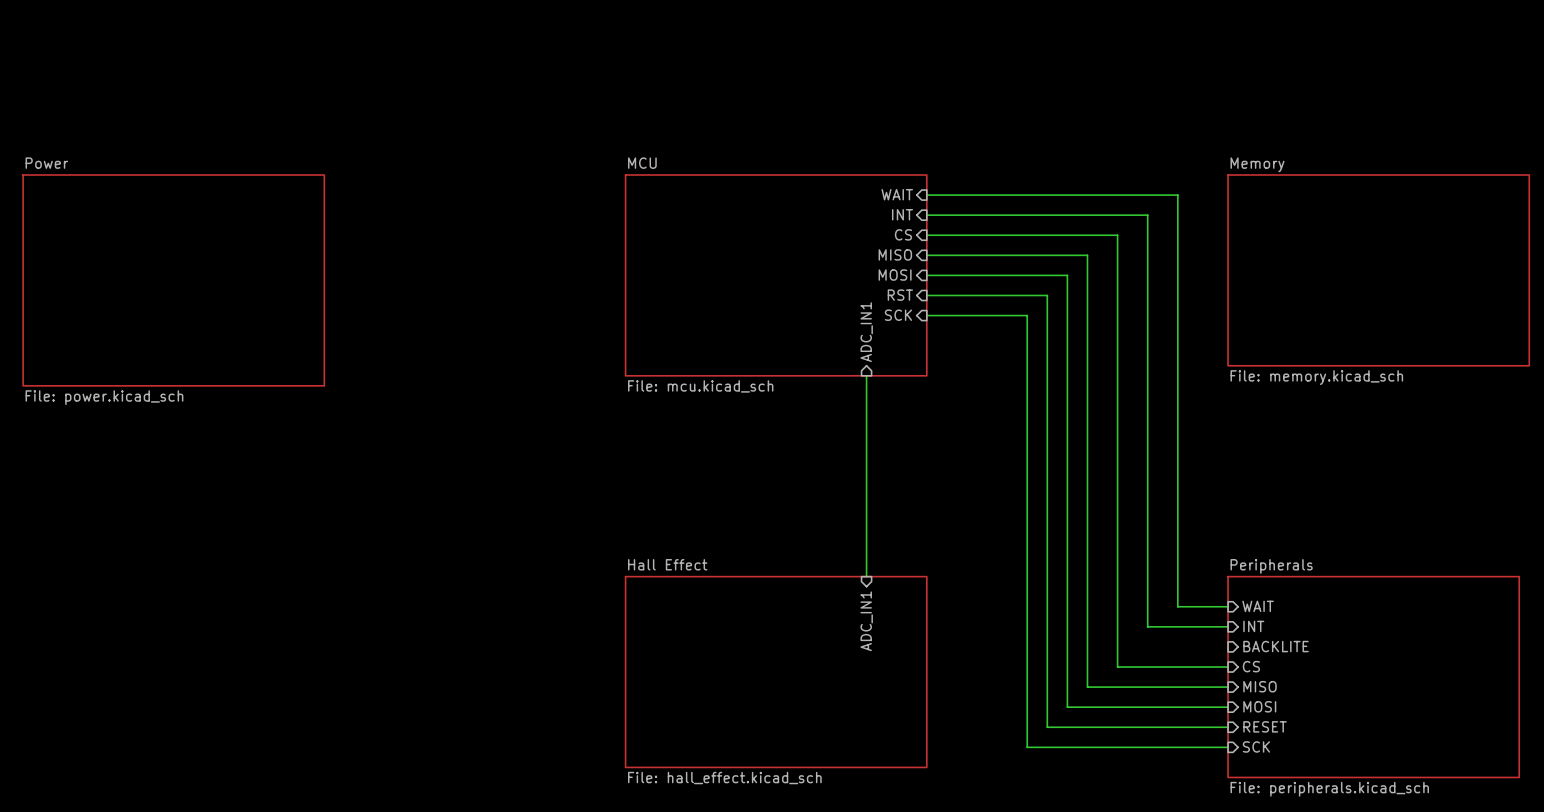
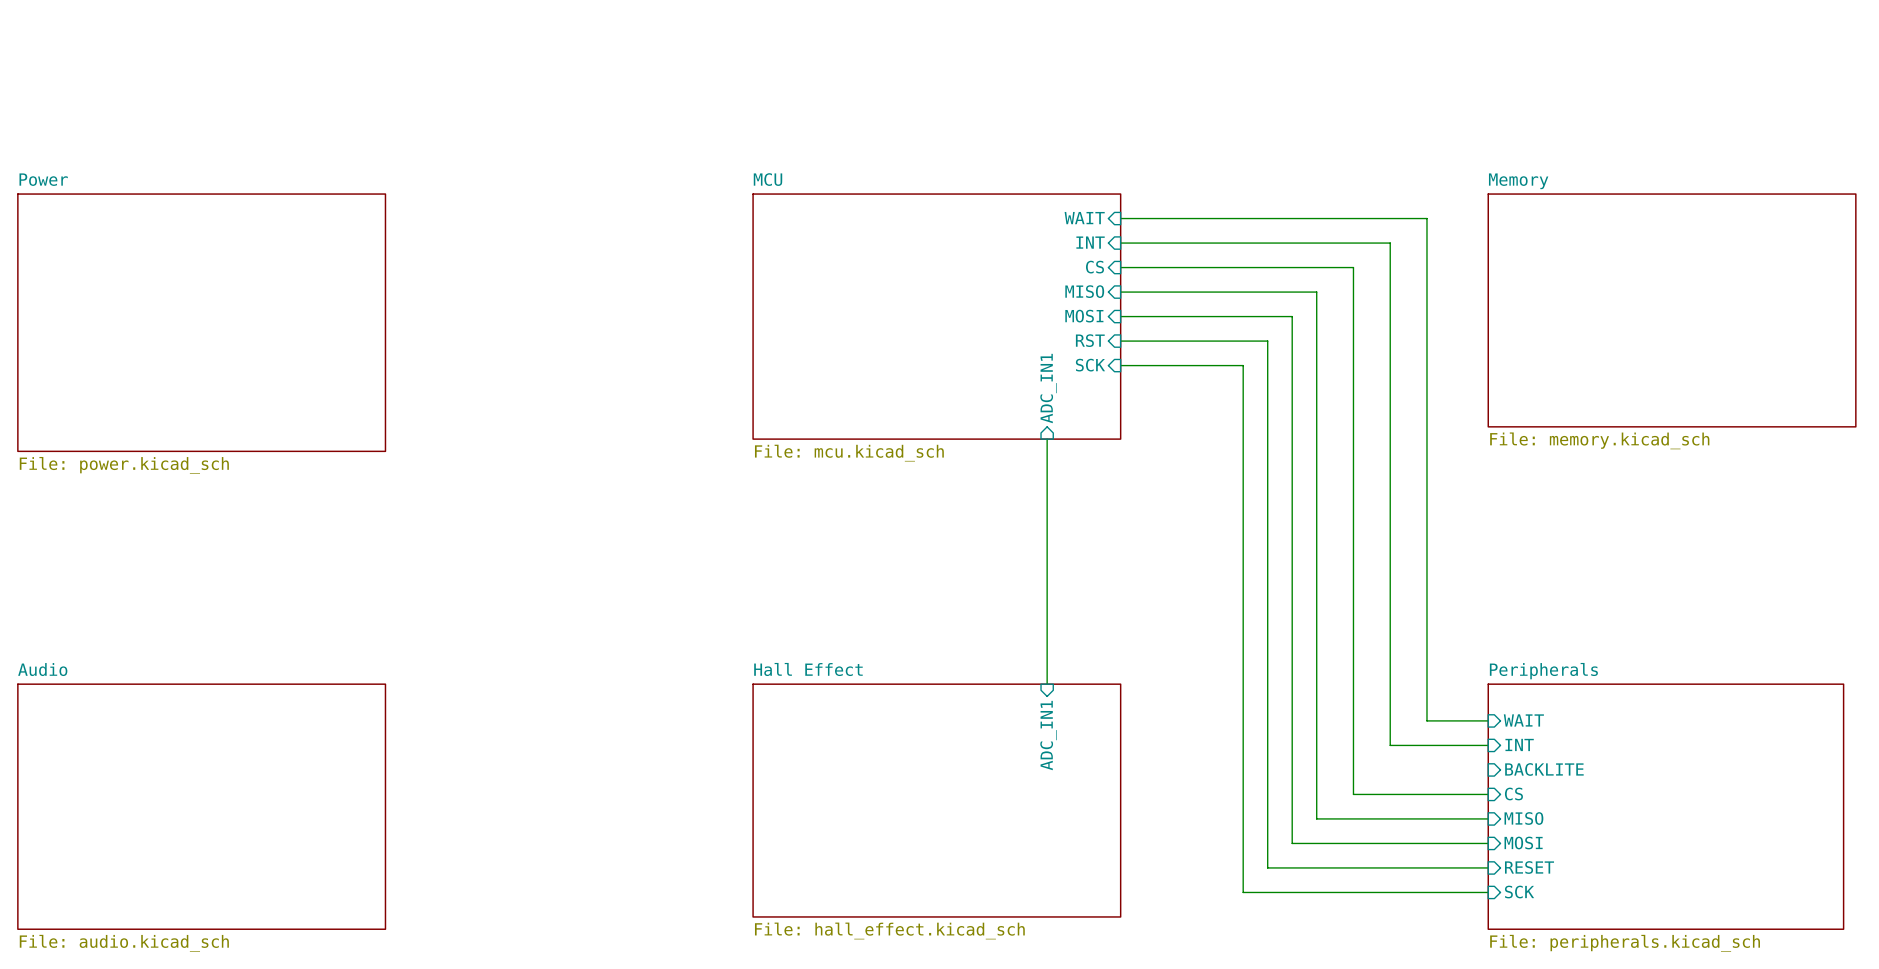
sheet Audio: none -> File: audio.kicad_sch (201, 806)

